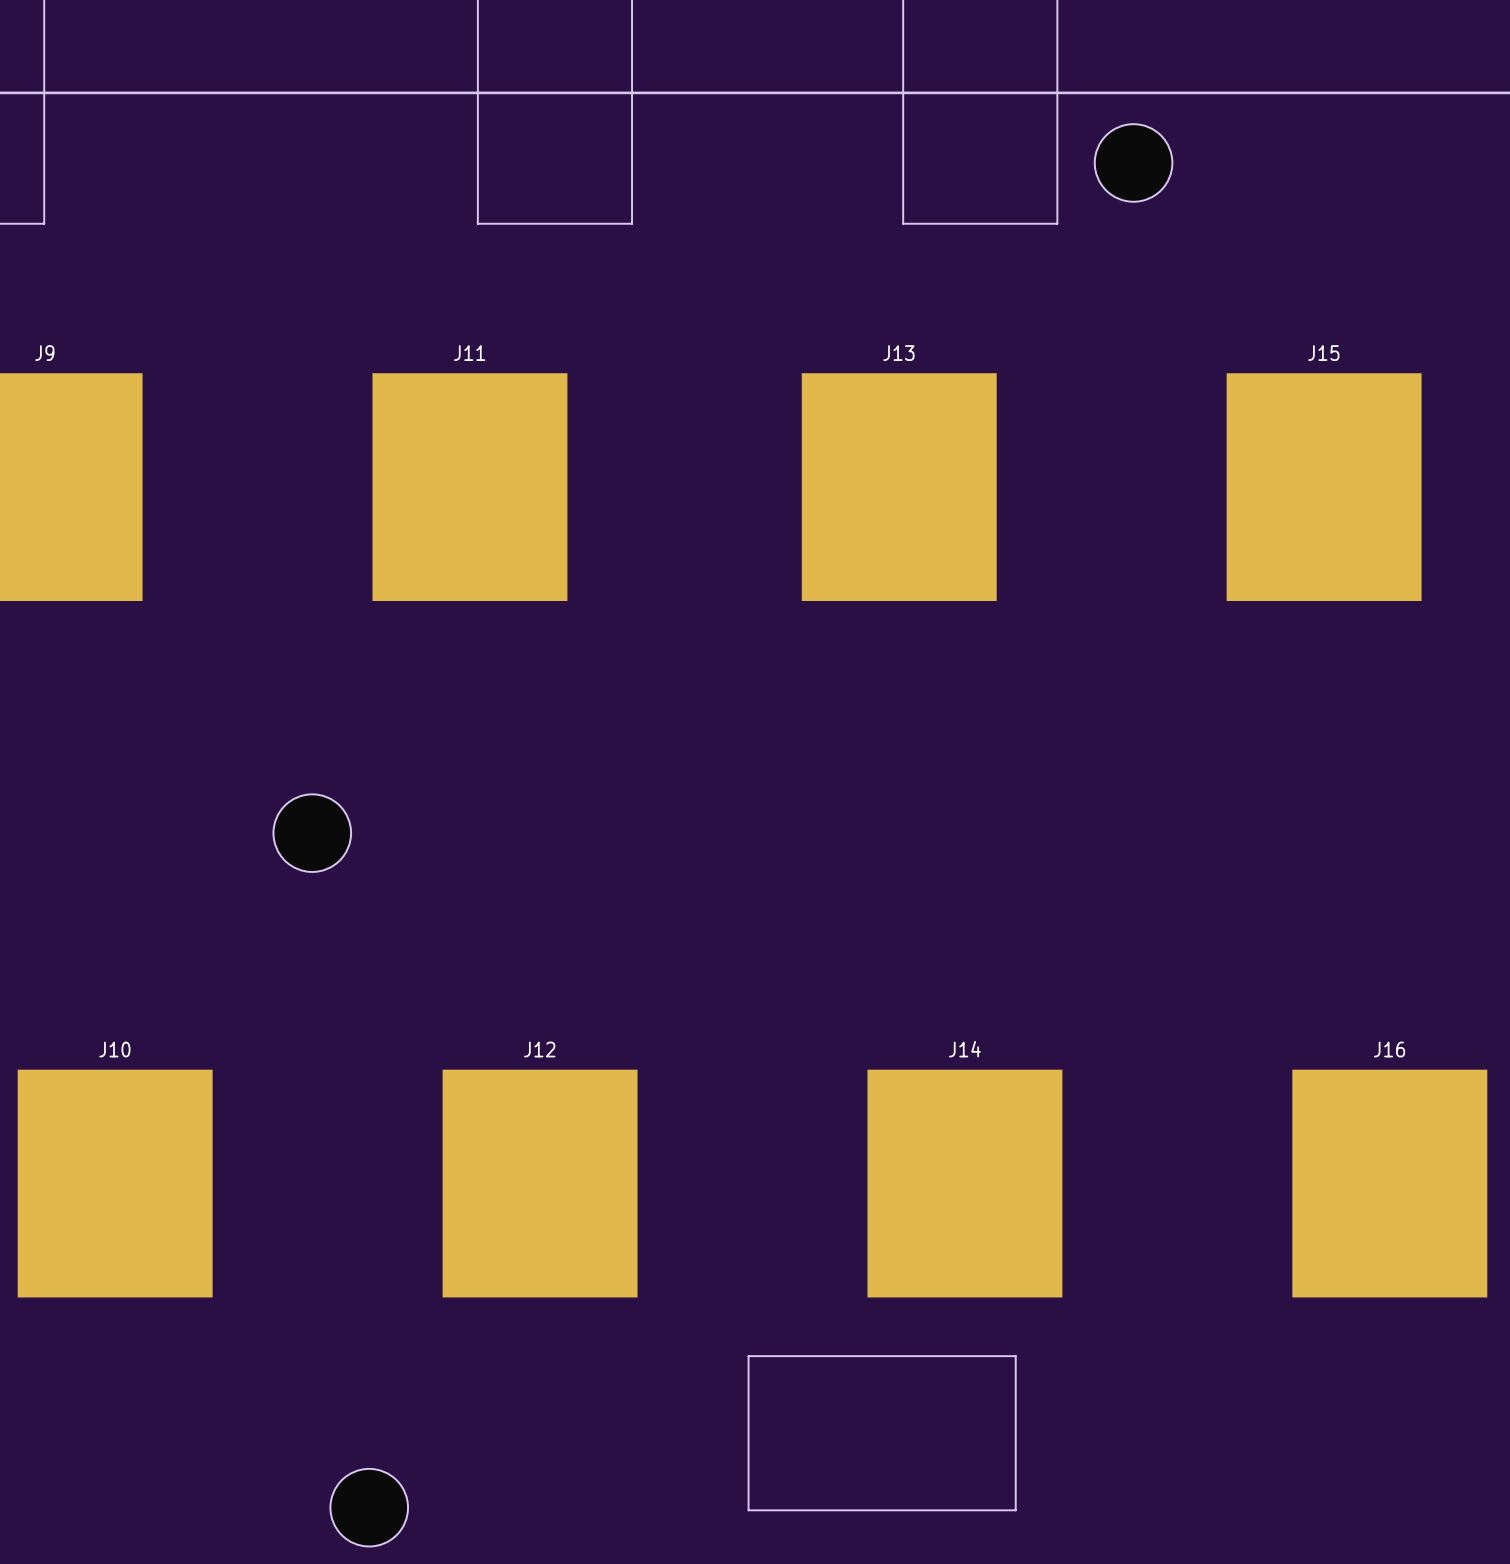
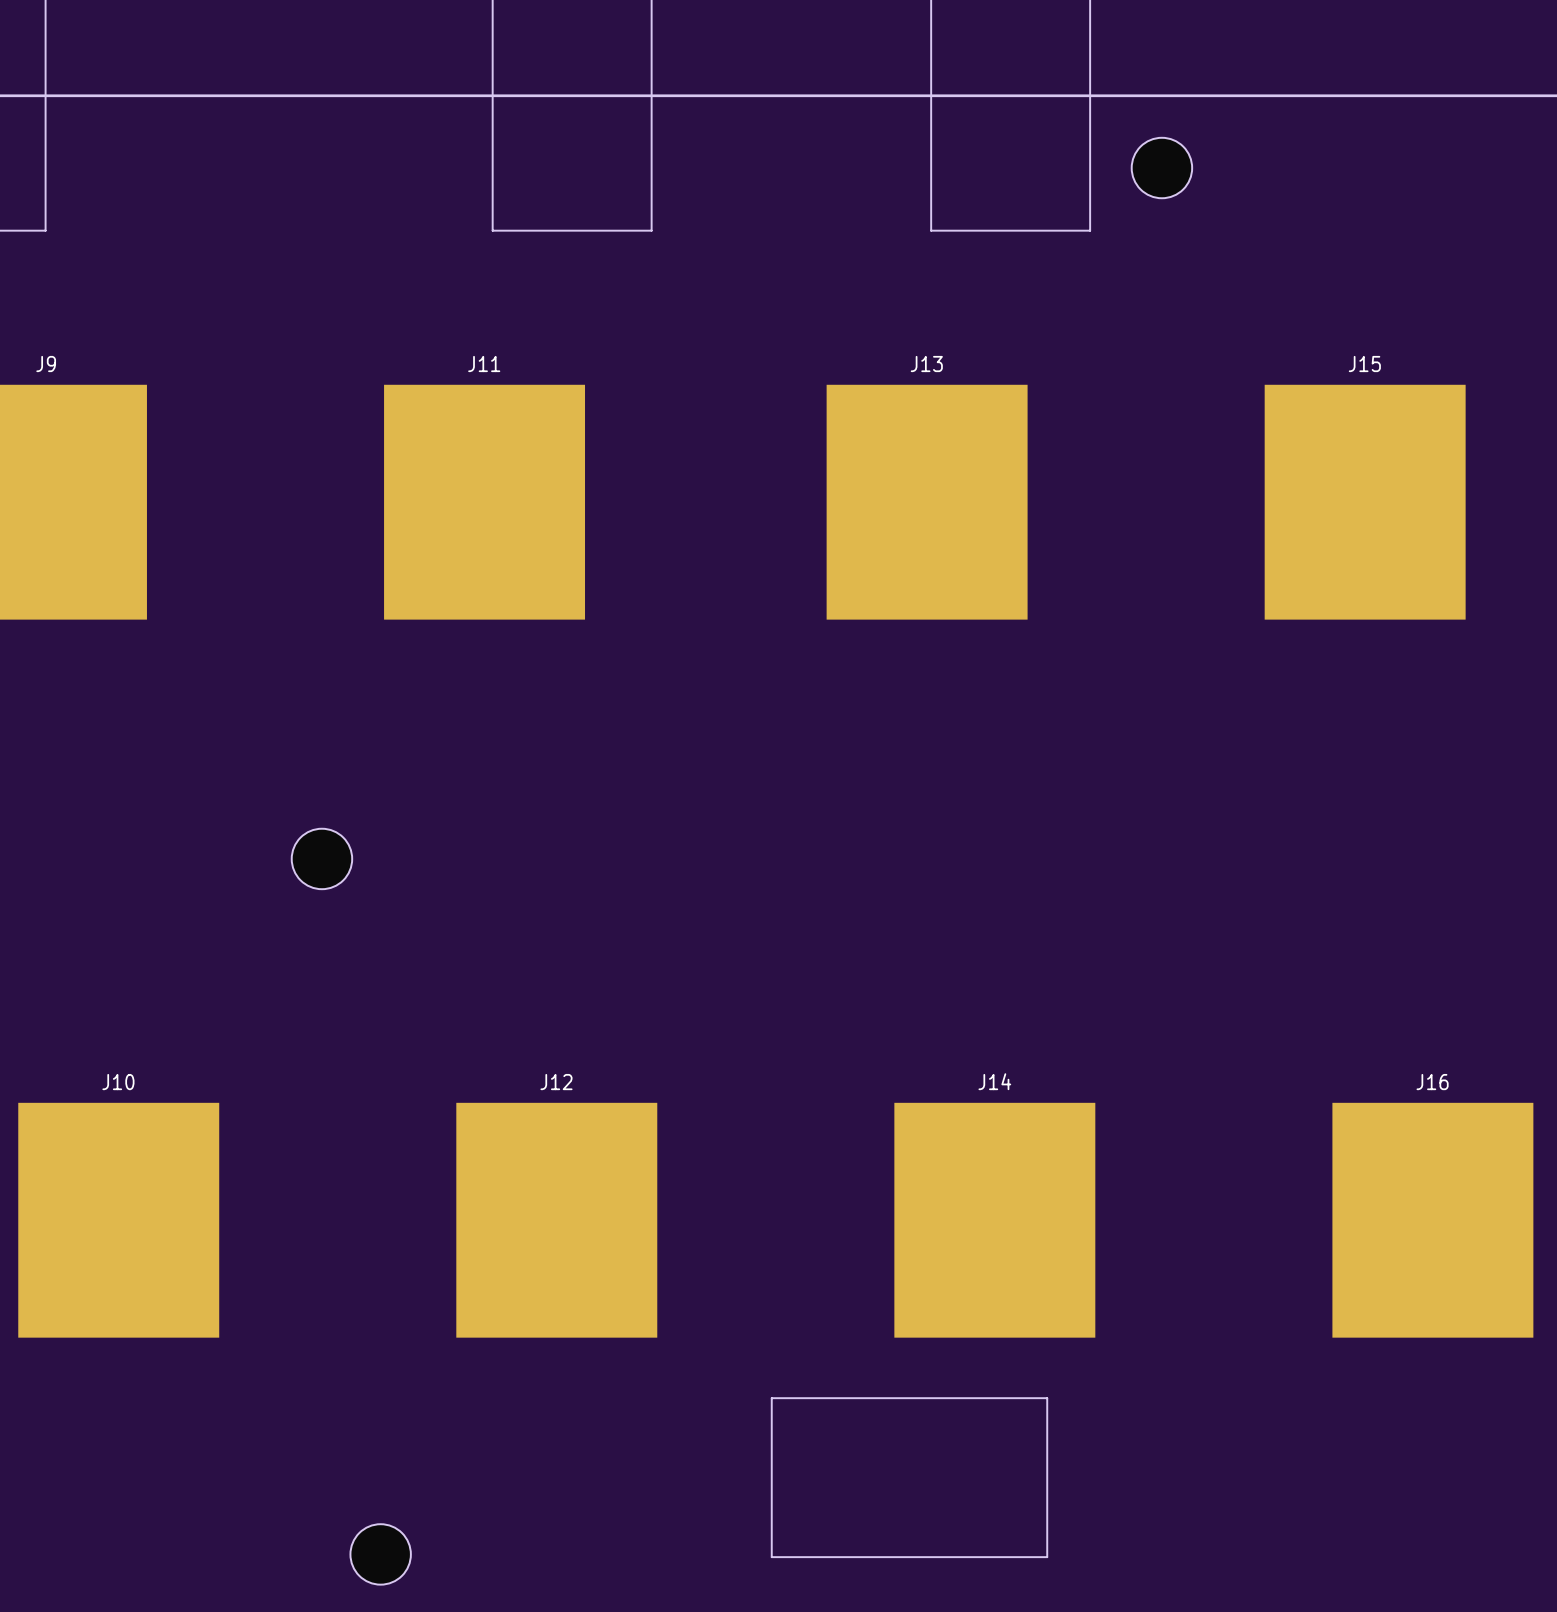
part footprint: [1094, 124, 1173, 202] -> [1131, 137, 1193, 199]
part footprint: [273, 794, 352, 872] -> [291, 828, 353, 890]
part footprint: [330, 1468, 409, 1547] -> [350, 1524, 411, 1585]

